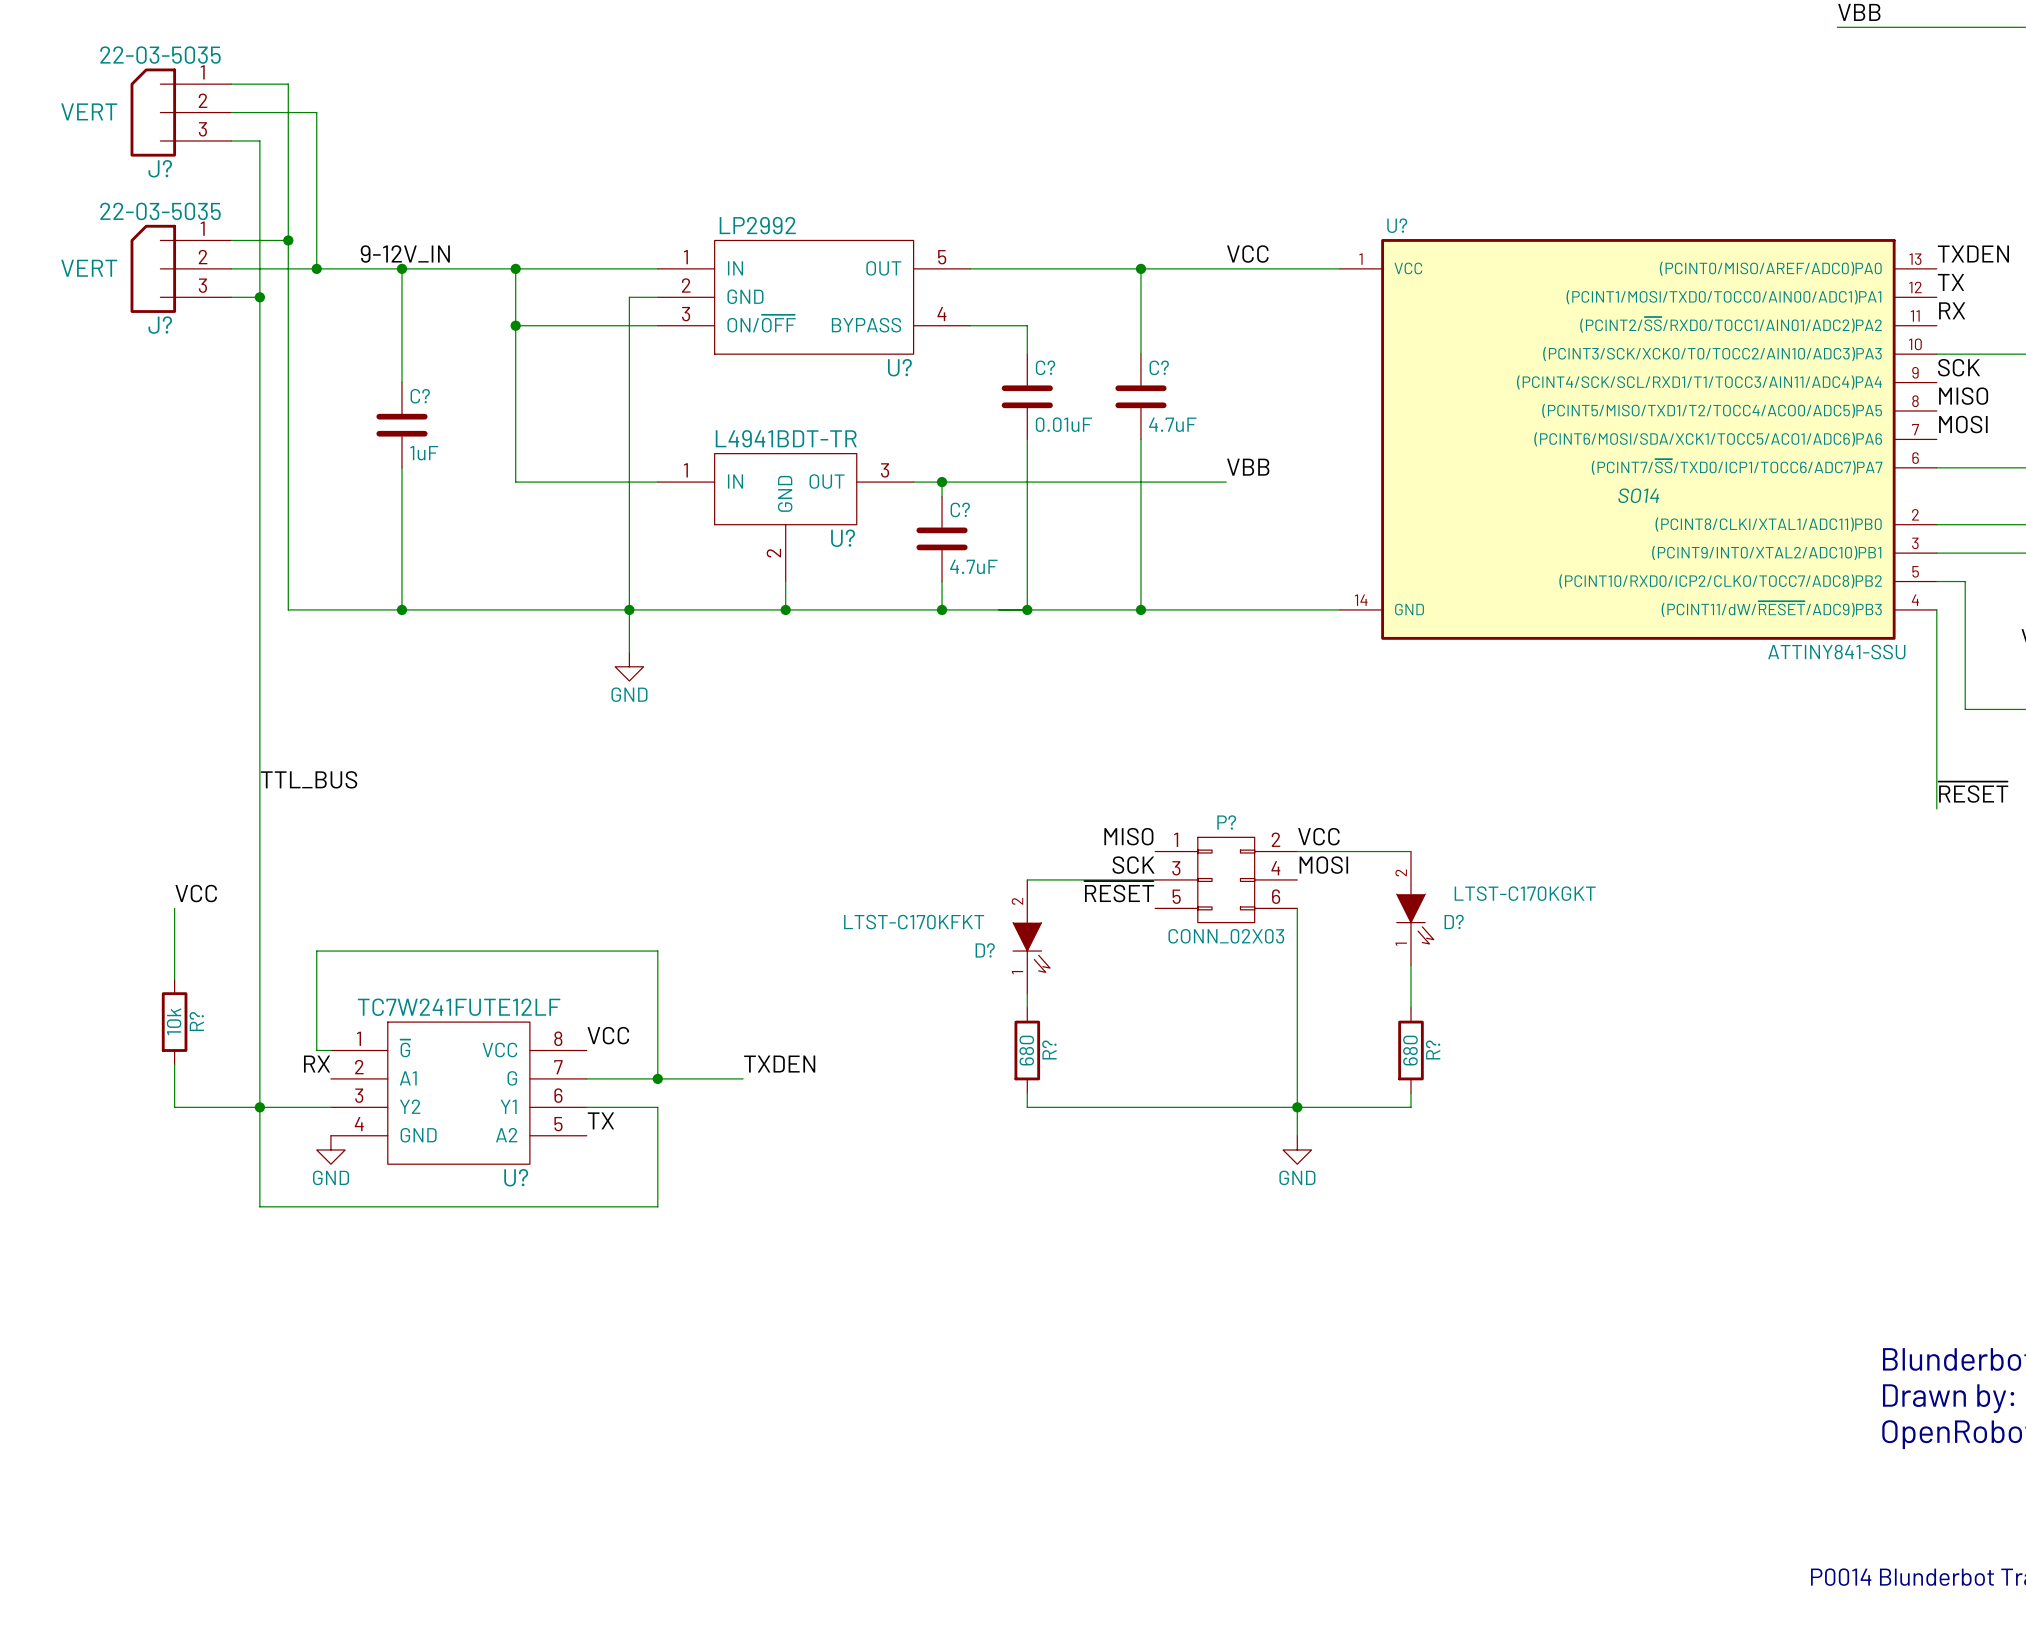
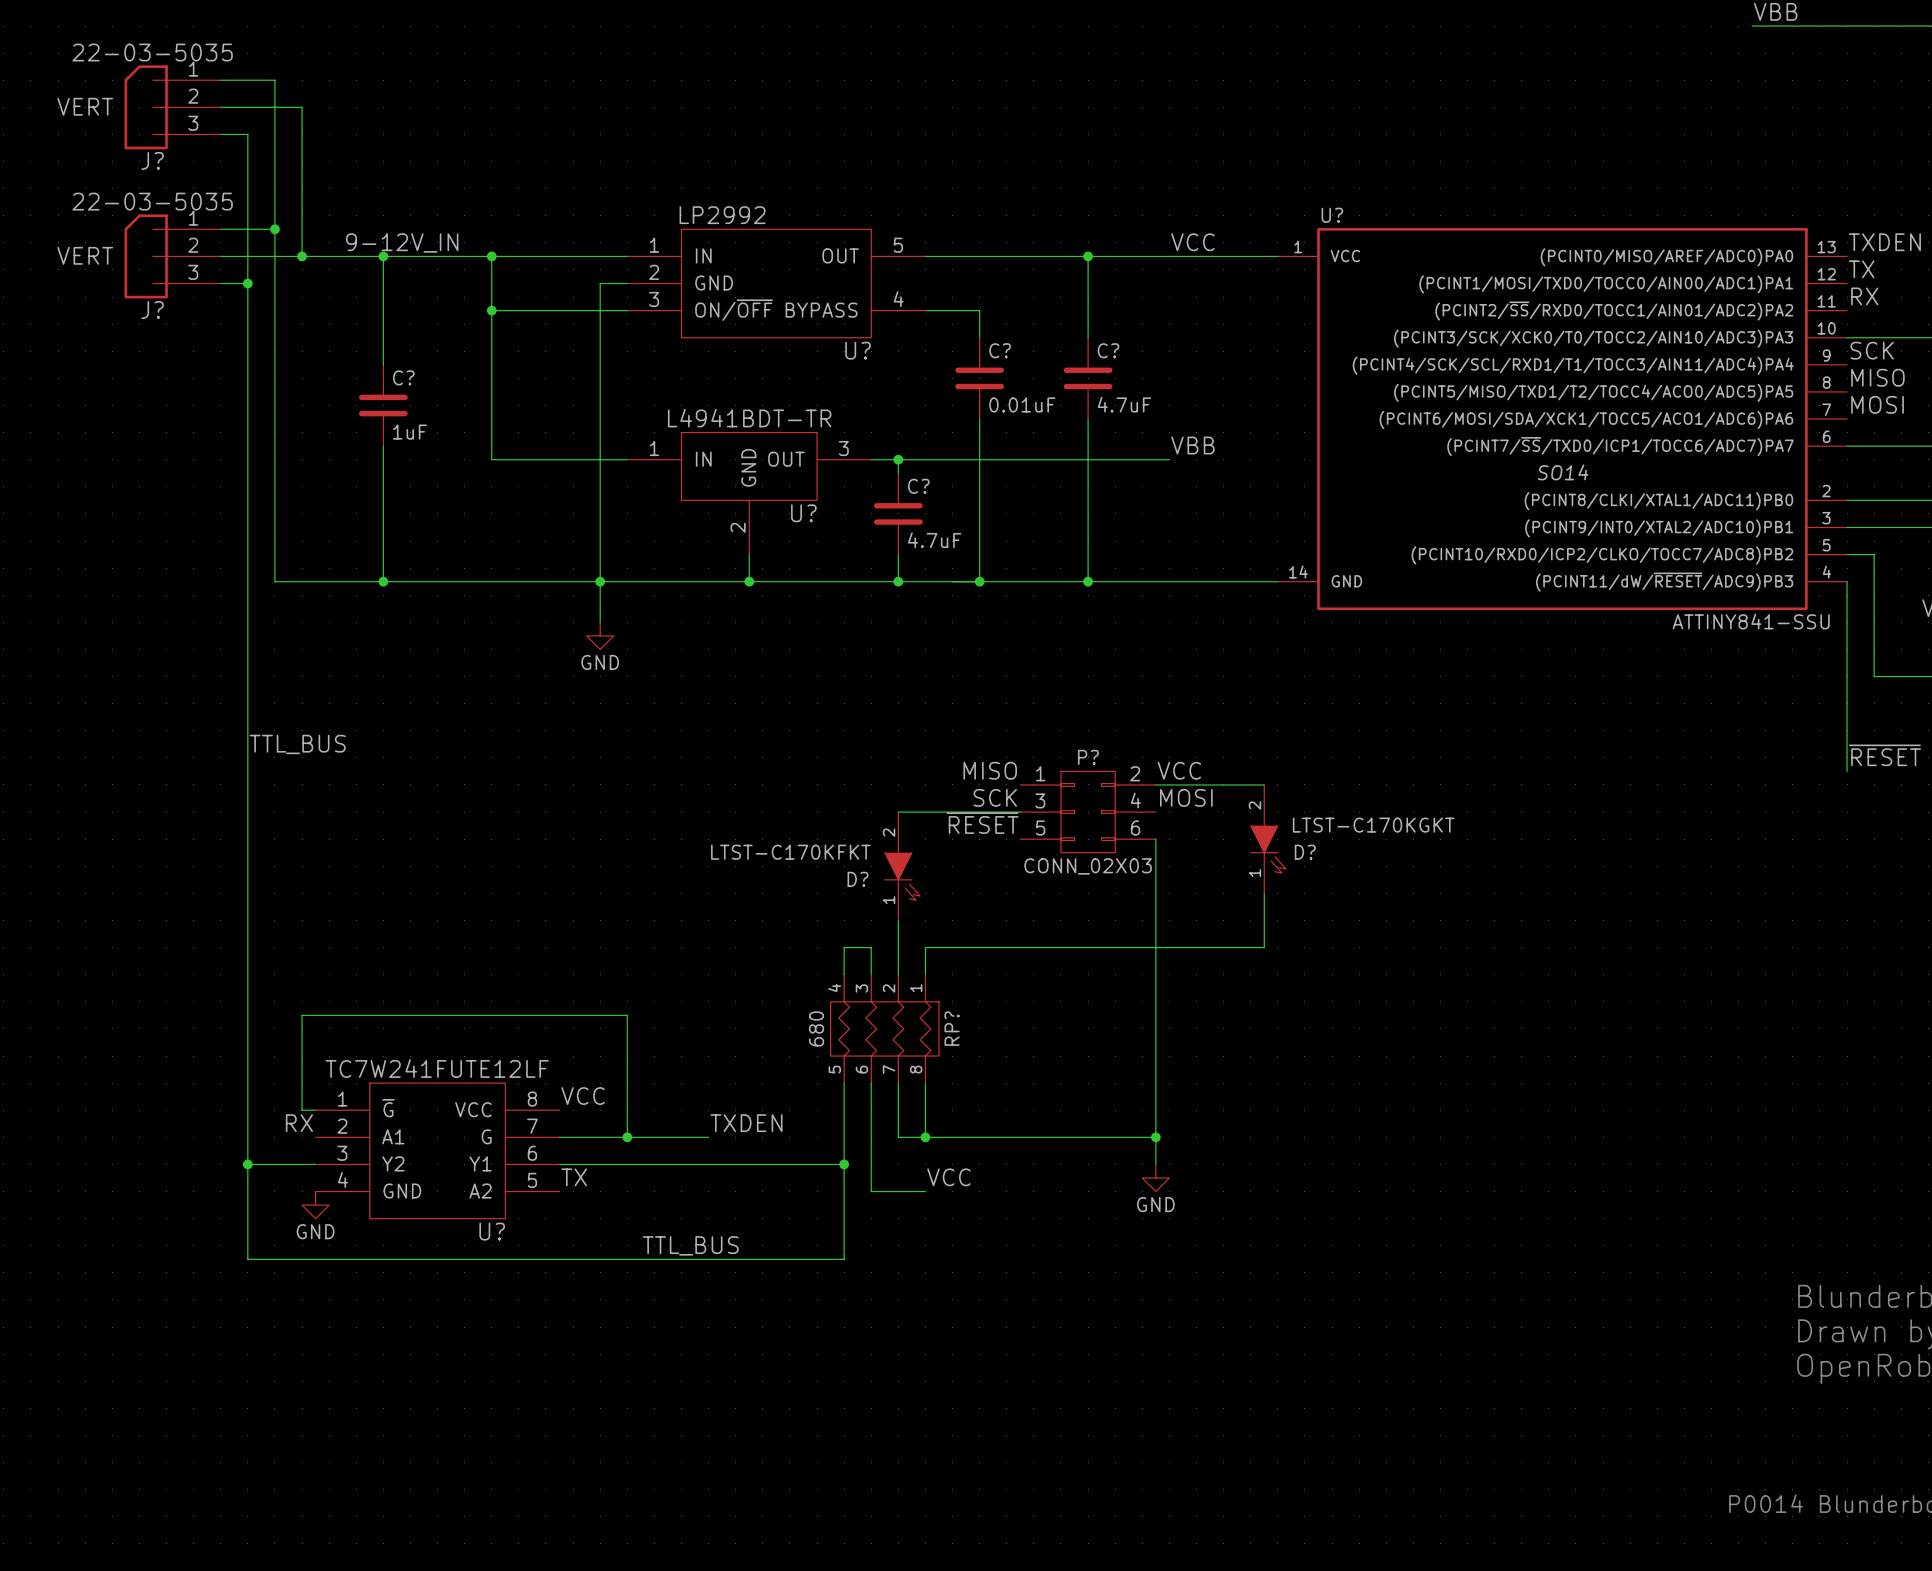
label position: MISO (1128, 836) -> MISO (990, 770)
label position: VCC (1318, 836) -> VCC (1179, 770)
wire: (1297, 851) (1410, 851) -> (1155, 784) (1264, 784)
label position: SCK (1133, 865) -> SCK (995, 797)
label position: MOSI (1323, 865) -> MOSI (1186, 797)
wire: (1027, 879) (1155, 879) -> (898, 812) (1020, 812)
wire: none -> (1155, 839) (1155, 1164)
P? position: (1226, 879) -> (1088, 812)
label position: ~{RESET} (1119, 891) -> ~{RESET} (982, 823)
label: VCC (196, 893) -> none
wire: (174, 908) (174, 979) -> none
wire: (1297, 908) (1297, 1135) -> none
D? position: (1415, 908) -> (1268, 839)
D? position: (1031, 936) -> (902, 866)
wire: none -> (1264, 893) (1264, 947) (925, 947) (925, 974)
wire: none -> (898, 920) (898, 974)
wire: (1410, 965) (1410, 1007) -> none
wire: (1027, 993) (1027, 1007) -> none
R?: 10k (174, 1022) -> none
wire: none -> (844, 974) (844, 947) (871, 947) (871, 974)
label position: VCC (608, 1035) -> VCC (583, 1096)
wire: (330, 1050) (316, 1050) (316, 951) (657, 951) (657, 1064) -> (315, 1110) (302, 1110) (302, 1015) (627, 1015)
R?: 680 (1027, 1050) -> none
R?: 680 (1410, 1050) -> none
wire: (174, 1064) (174, 1107) (330, 1107) -> none
label position: RX (316, 1064) -> RX (299, 1123)
label position: TXDEN (779, 1064) -> TXDEN (746, 1123)
wire: (586, 1078) (743, 1078) -> (559, 1137) (708, 1137)
junction: (657, 1078) -> none
RP?: none -> 680 (884, 1028)
U? position: (458, 1093) -> (437, 1150)
wire: (1027, 1093) (1027, 1107) (1410, 1107) (1410, 1093) -> none
junction: (259, 1107) -> none
wire: (586, 1107) (657, 1107) -> (627, 1028) (627, 1056)
junction: (1297, 1107) -> none
label position: TX (600, 1120) -> TX (574, 1177)
wire: none -> (871, 1083) (871, 1191) (925, 1191)
wire: none -> (898, 1083) (898, 1137) (1155, 1137)
wire: none -> (925, 1083) (925, 1137)
power symbol position: GND (330, 1149) -> GND (315, 1205)
power symbol position: GND (1297, 1149) -> GND (1155, 1177)
wire: (657, 1192) (657, 1206) (259, 1206) -> (844, 1083) (844, 1259) (247, 1259) (247, 1150)
junction: none -> (627, 1137)
junction: none -> (925, 1137)
junction: none -> (1155, 1137)
wire: none -> (247, 1164) (315, 1164)
junction: none -> (247, 1164)
wire: none -> (559, 1164) (844, 1164)
junction: none -> (844, 1164)
label: none -> VCC (948, 1177)
label: none -> TTL_BUS (690, 1245)

